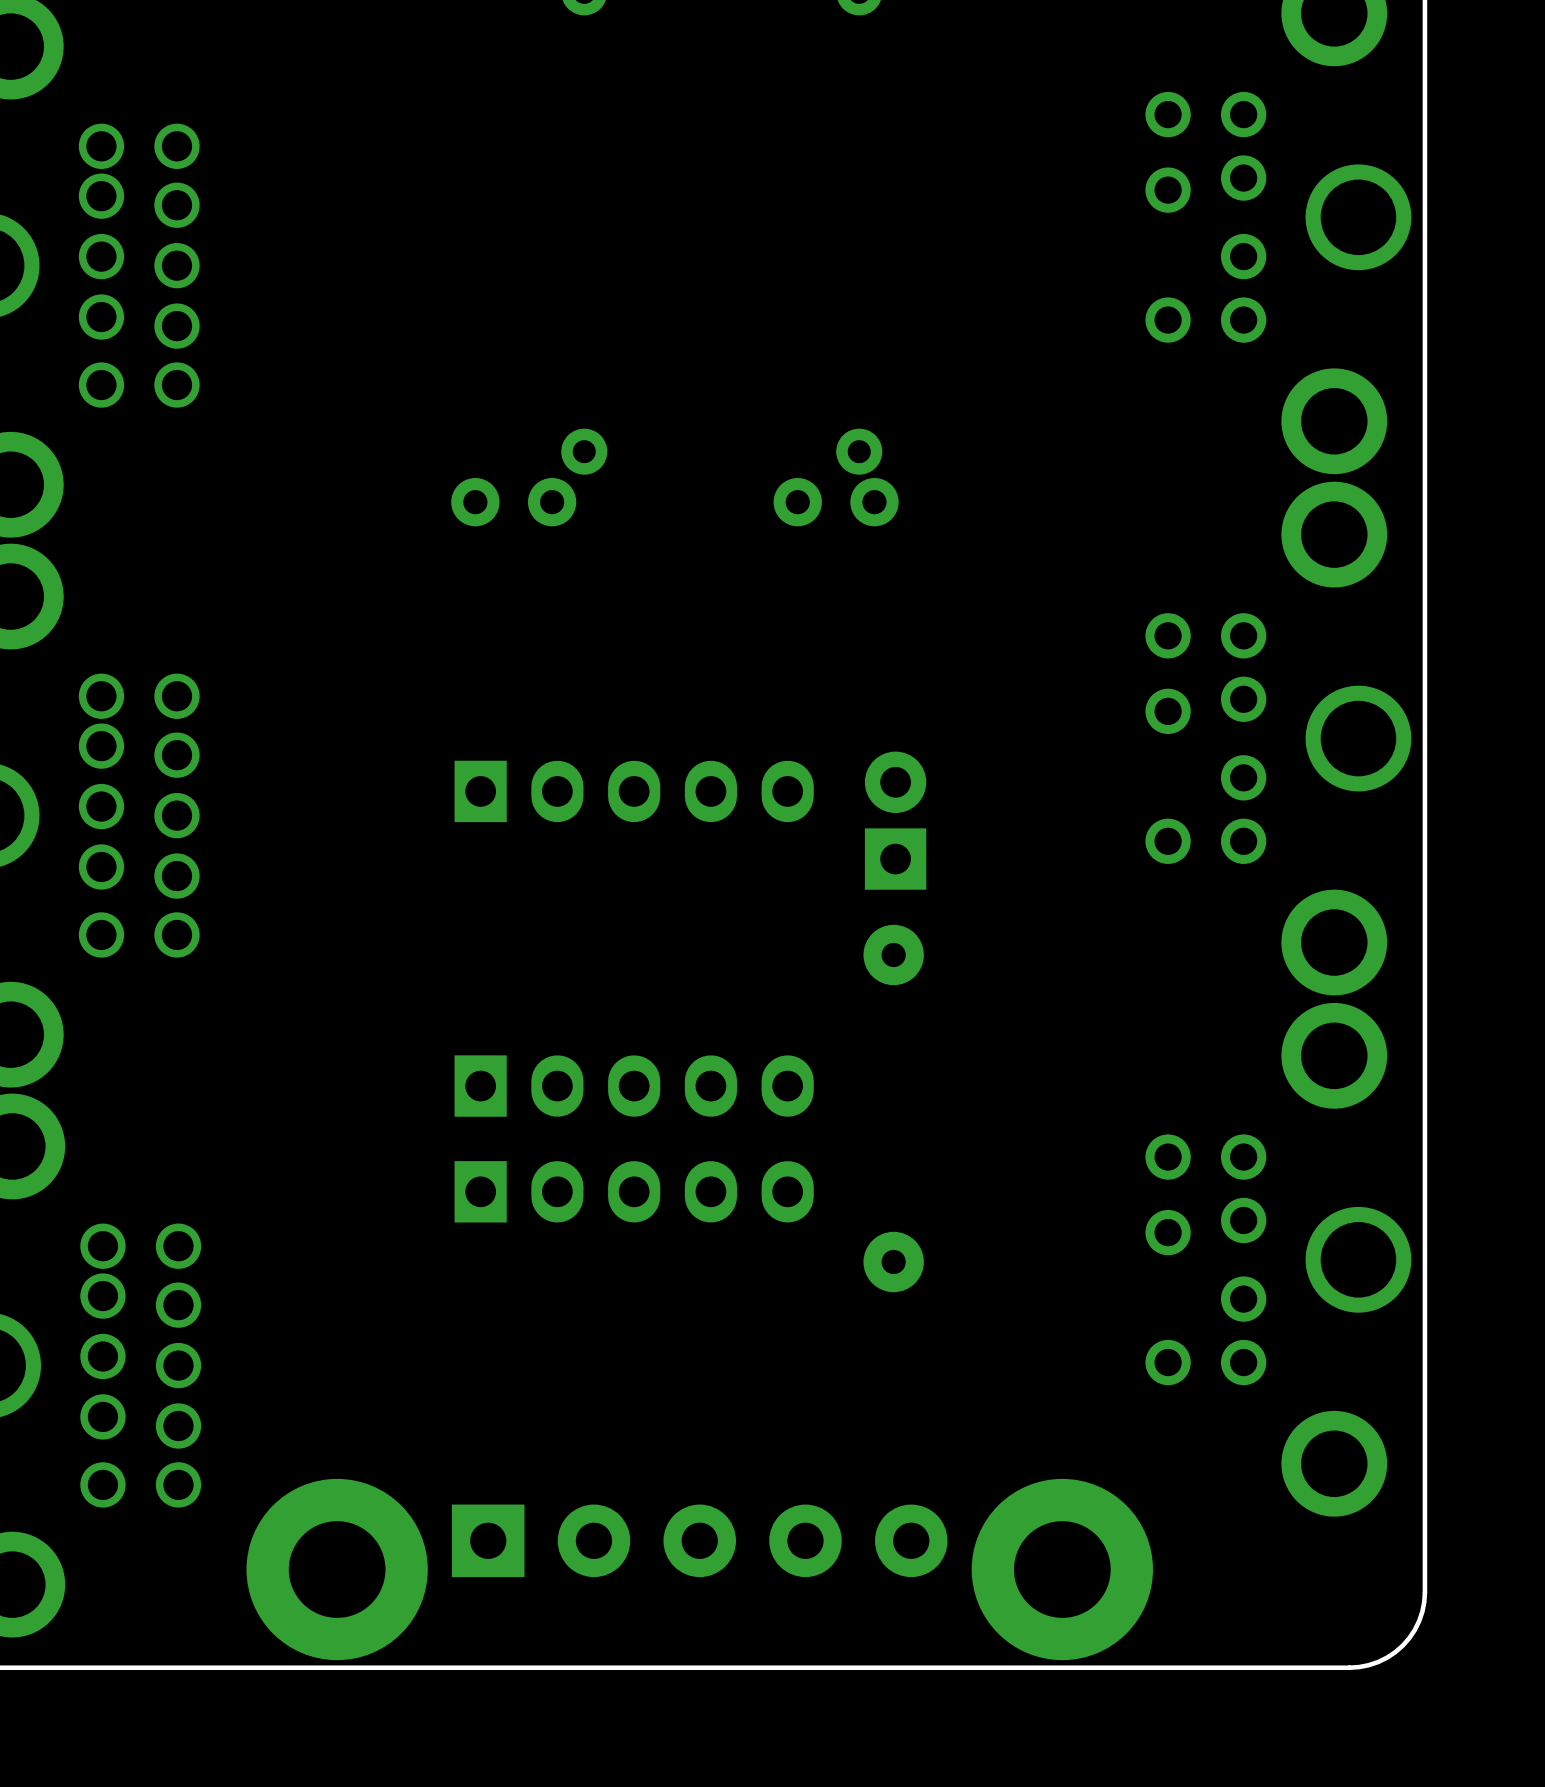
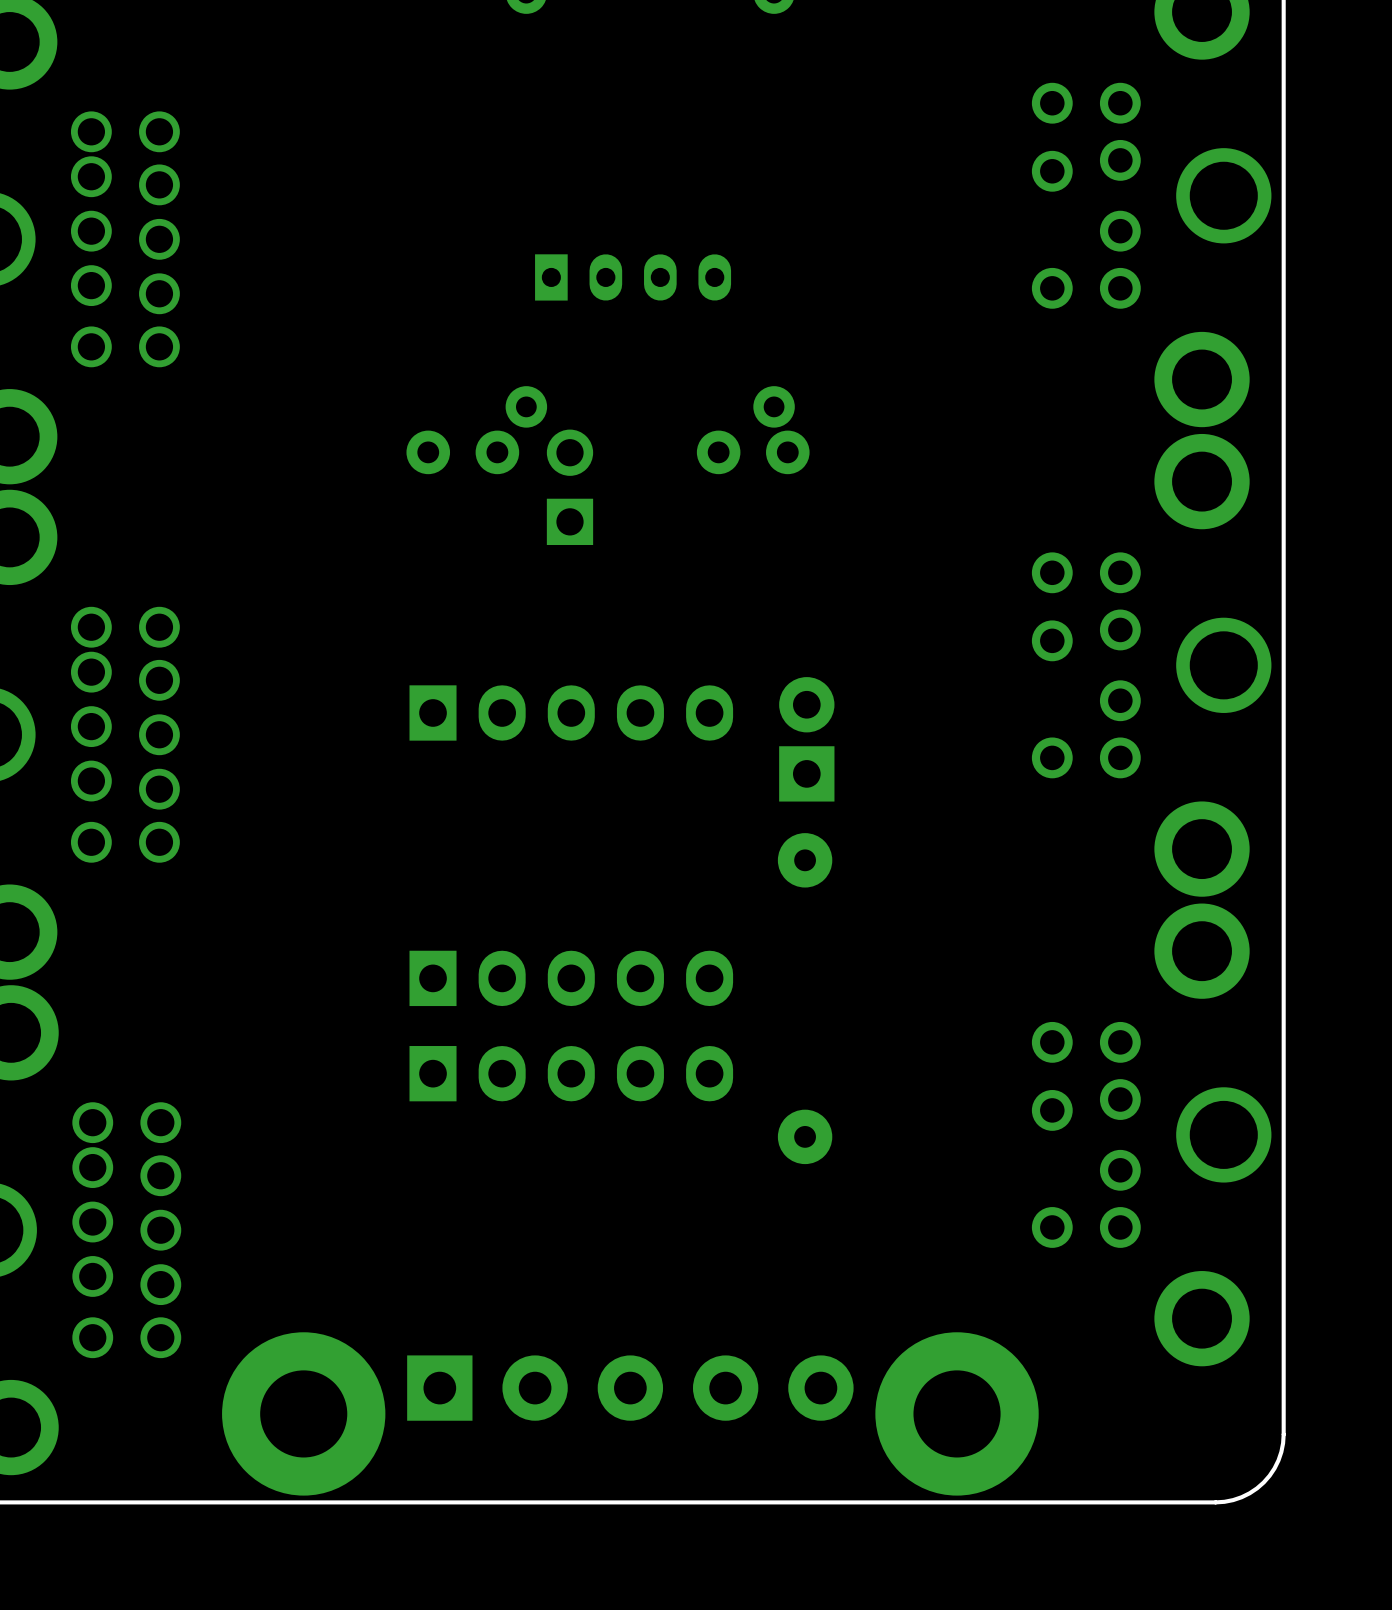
part: none -> (633, 277)
part: none -> (569, 487)

